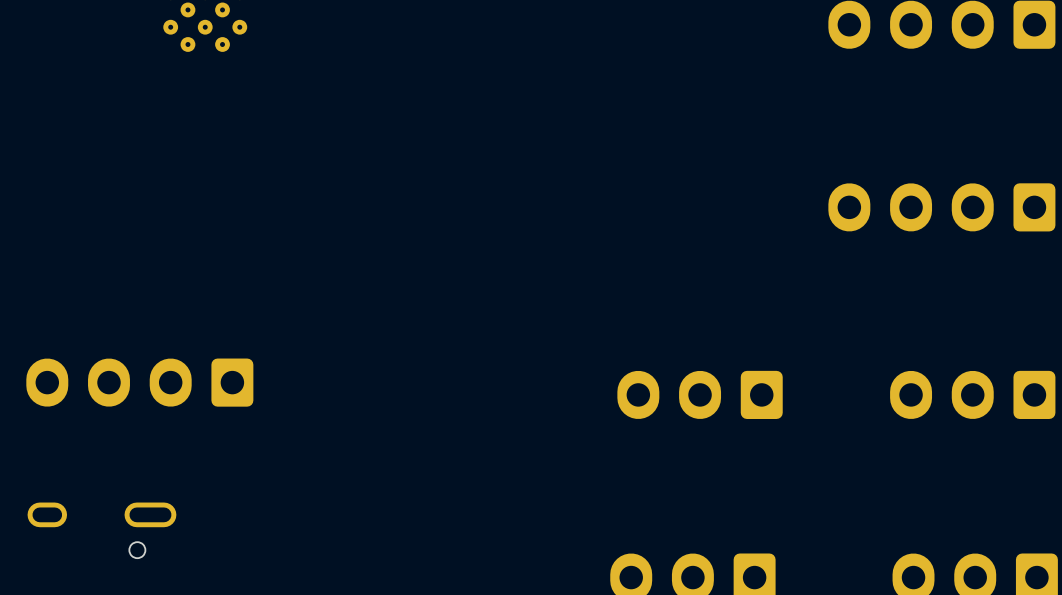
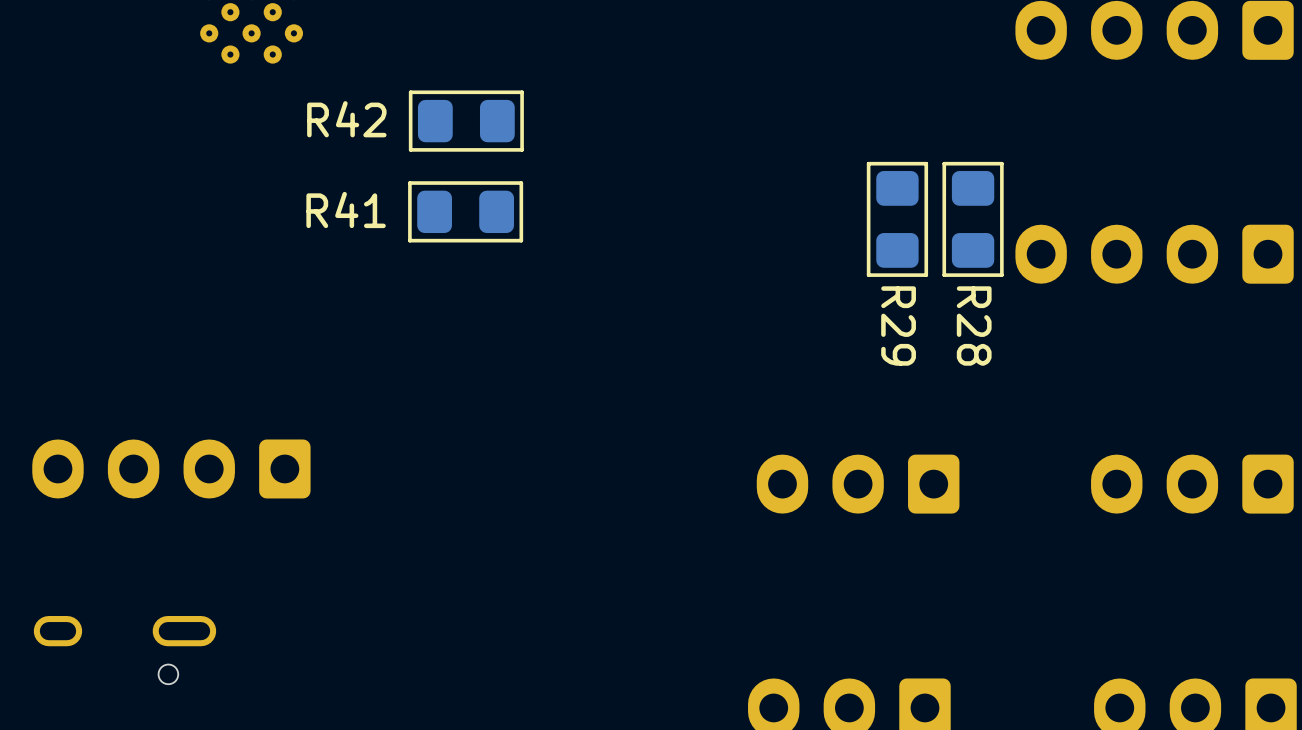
R42: none -> (466, 121)
R41: none -> (465, 211)
R29: none -> (897, 219)
R28: none -> (973, 219)

